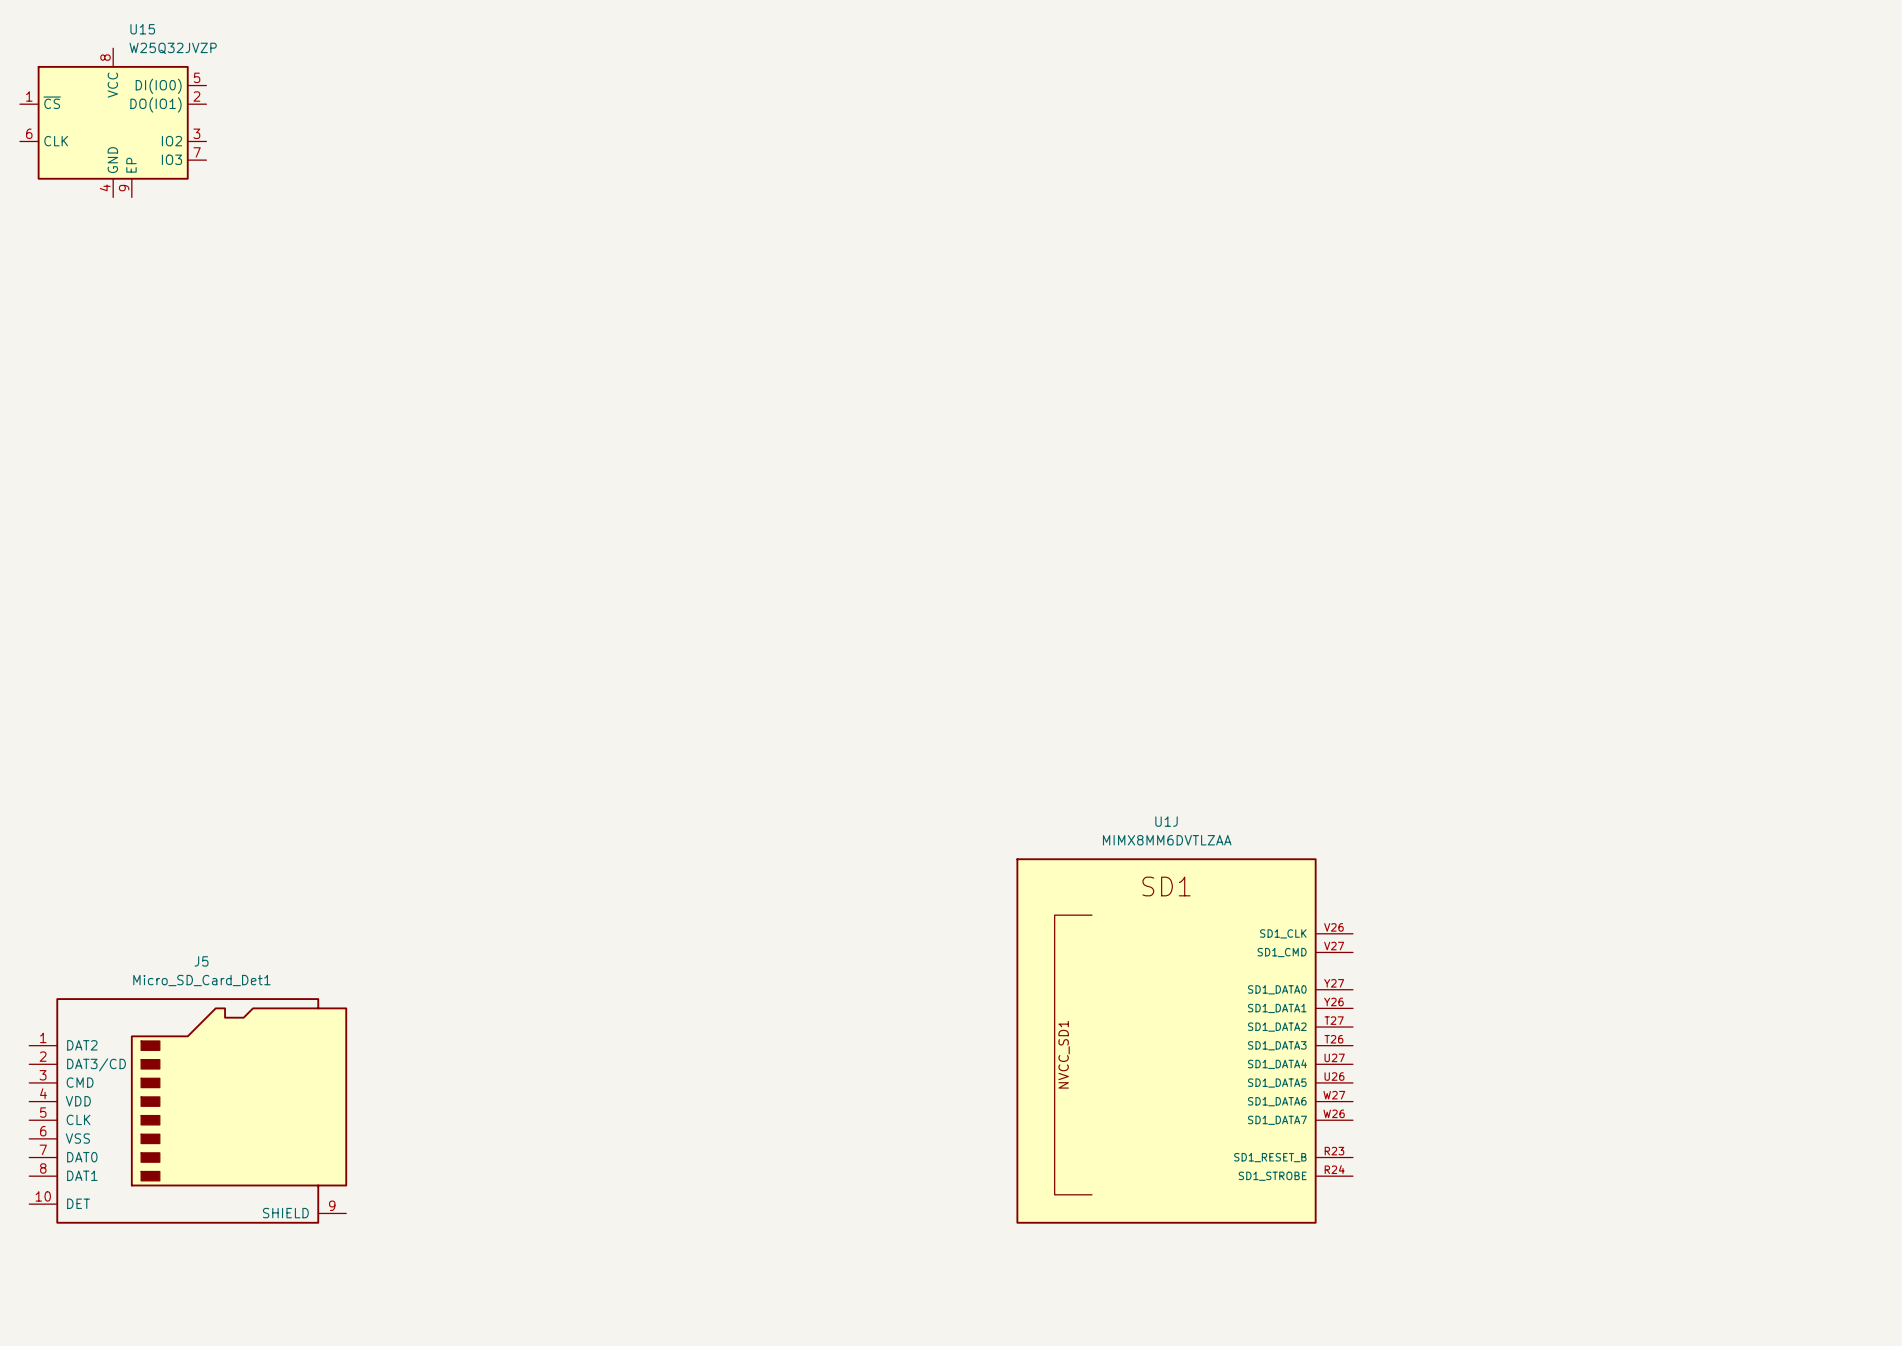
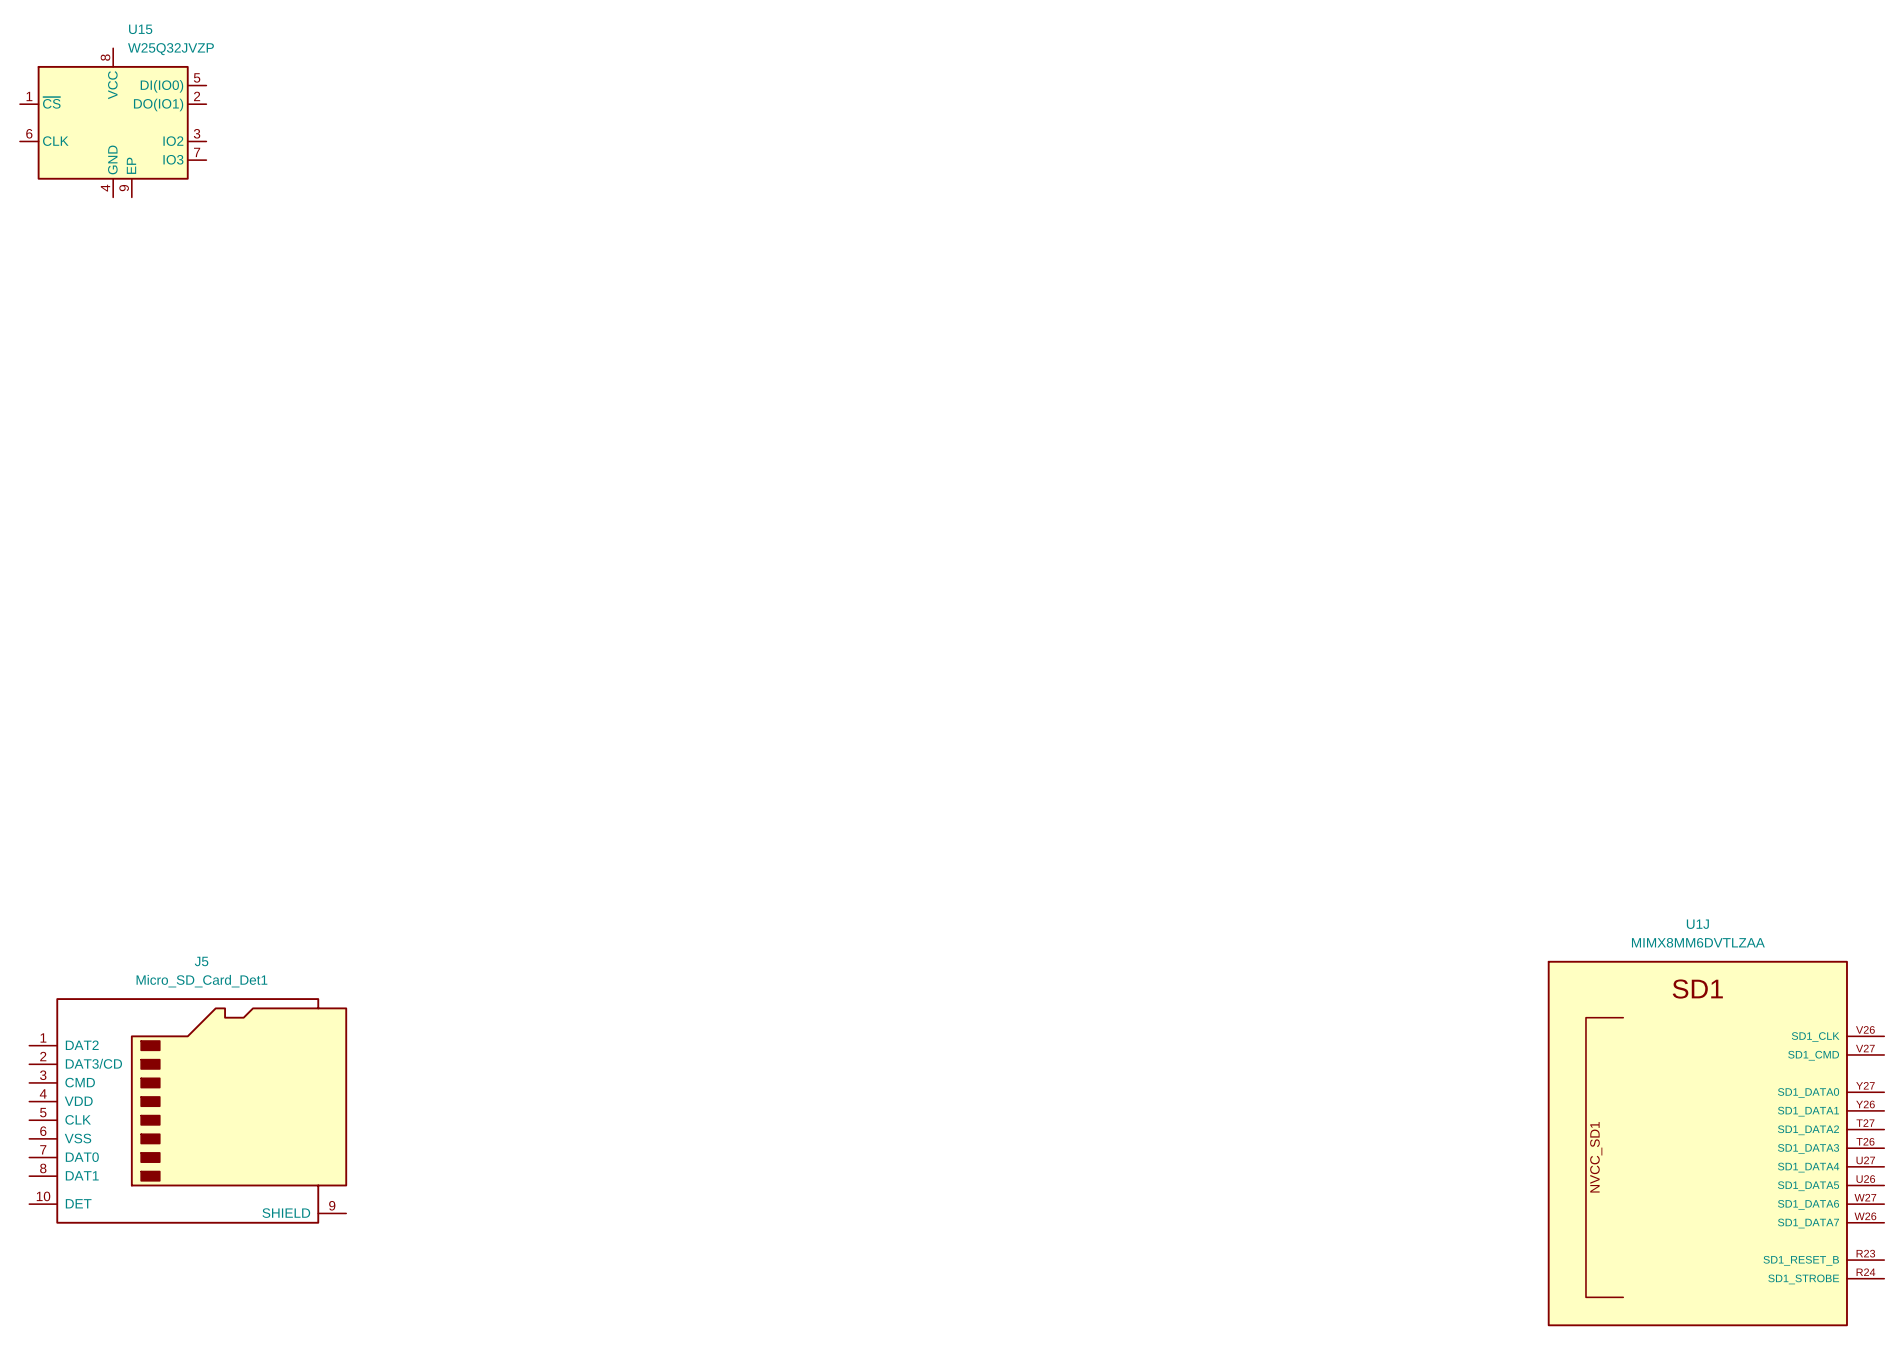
U1J position: (1184, 1041) -> (1716, 1143)

